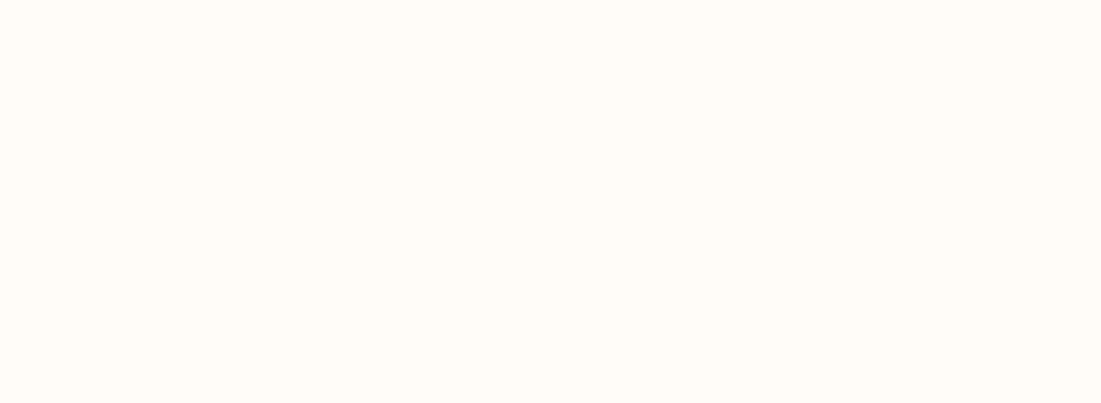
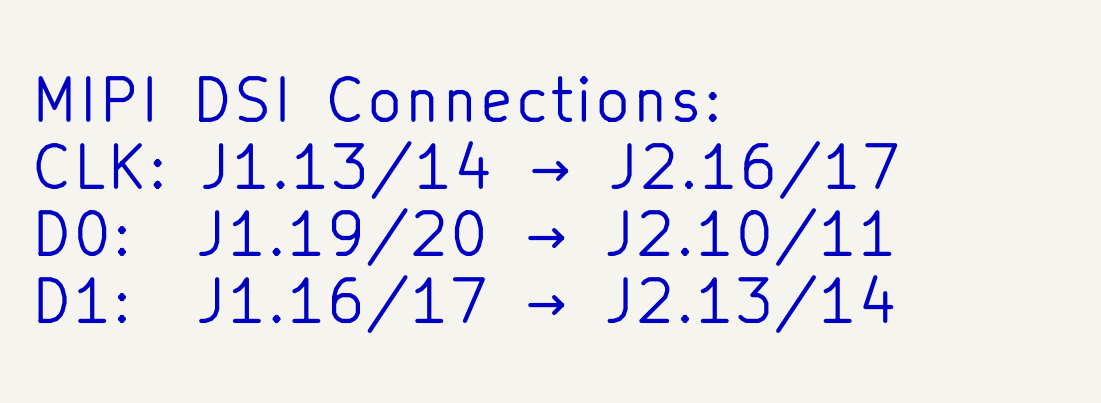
text: none -> MIPI DSI Connections: (377, 99)
text: none -> CLK: J1.13/14 → J2.16/17 (466, 170)
text: none -> D0: J1.19/20 → J2.10/11 (464, 237)
text: none -> D1: J1.16/17 → J2.13/14 (465, 304)

